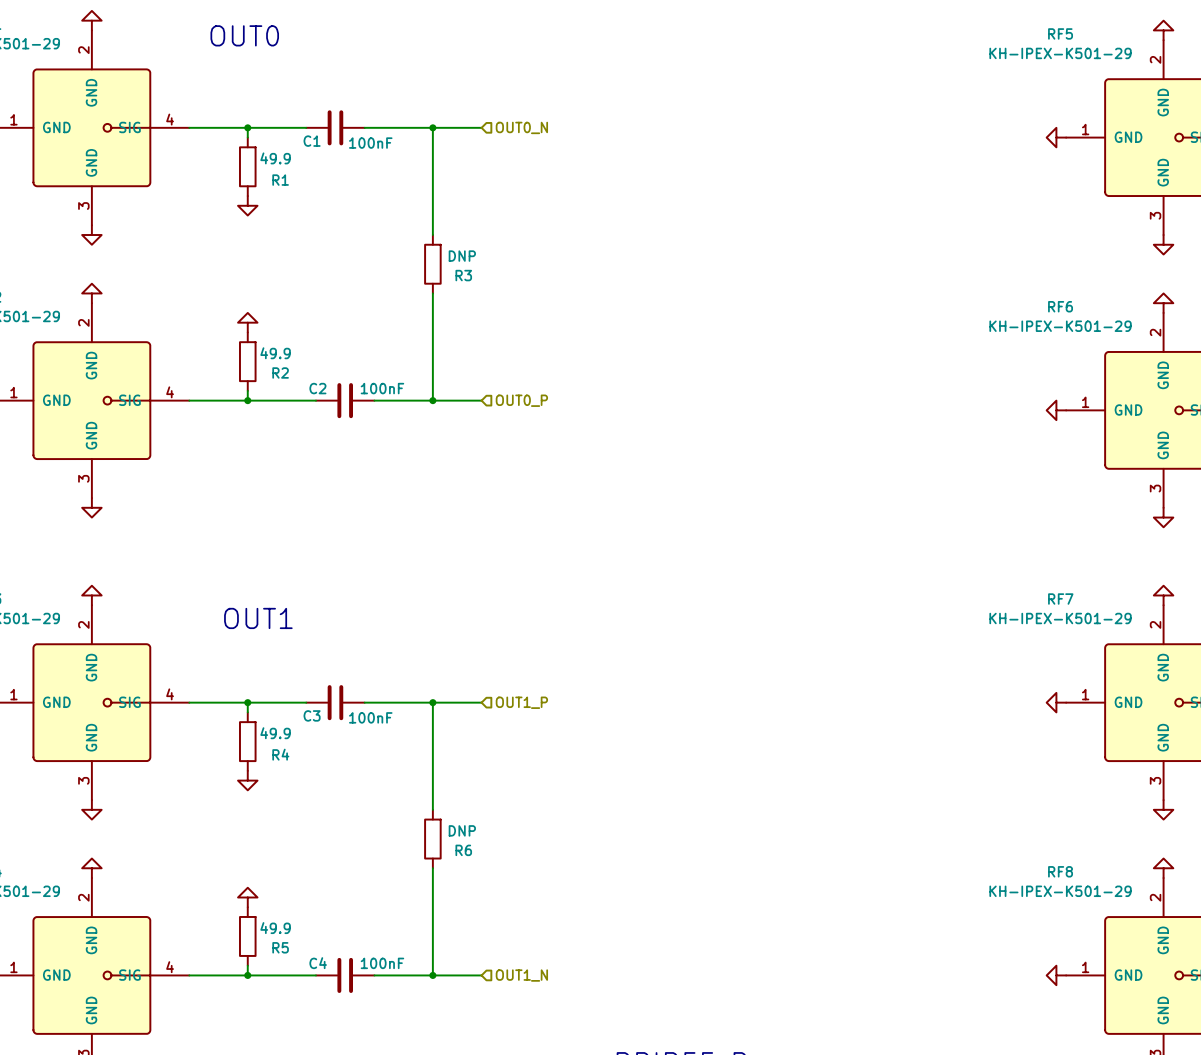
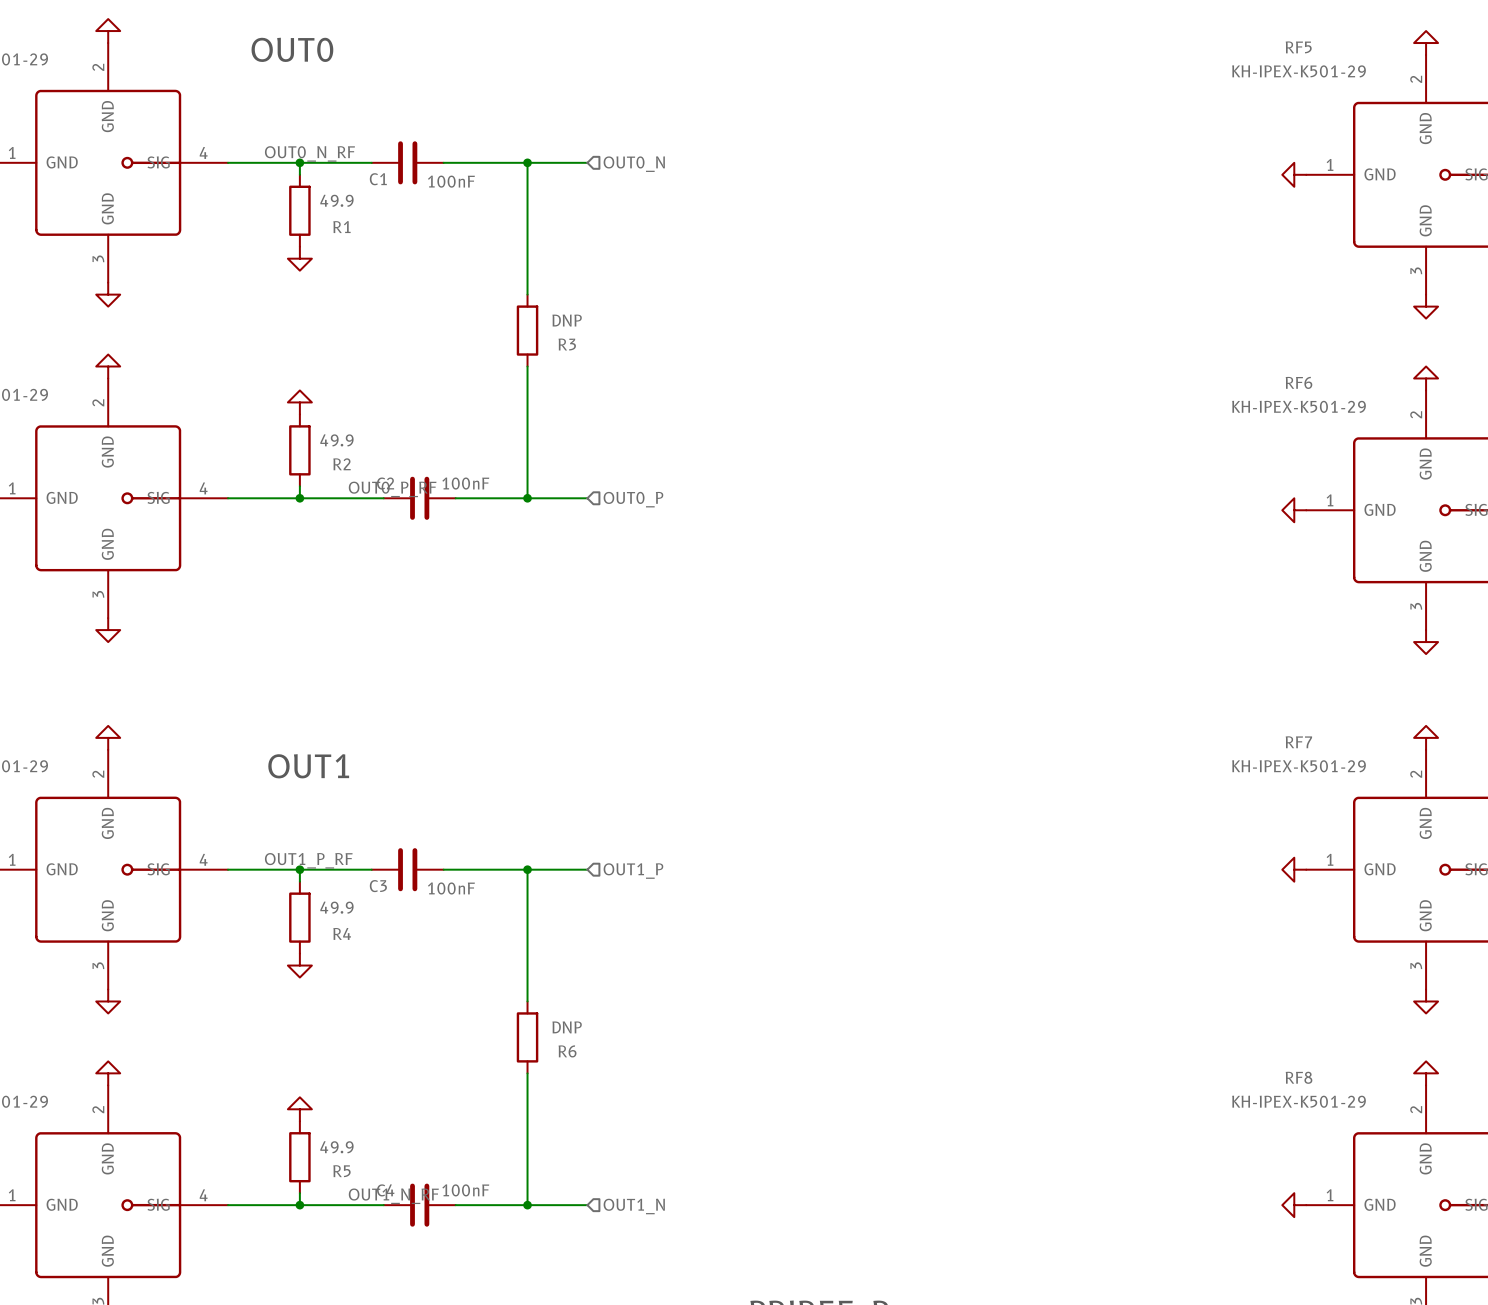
label: none -> OUT0_N_RF (309, 153)
label: none -> OUT0_P_RF (392, 489)
label: none -> OUT1_P_RF (308, 860)
label: none -> OUT1_N_RF (393, 1196)

